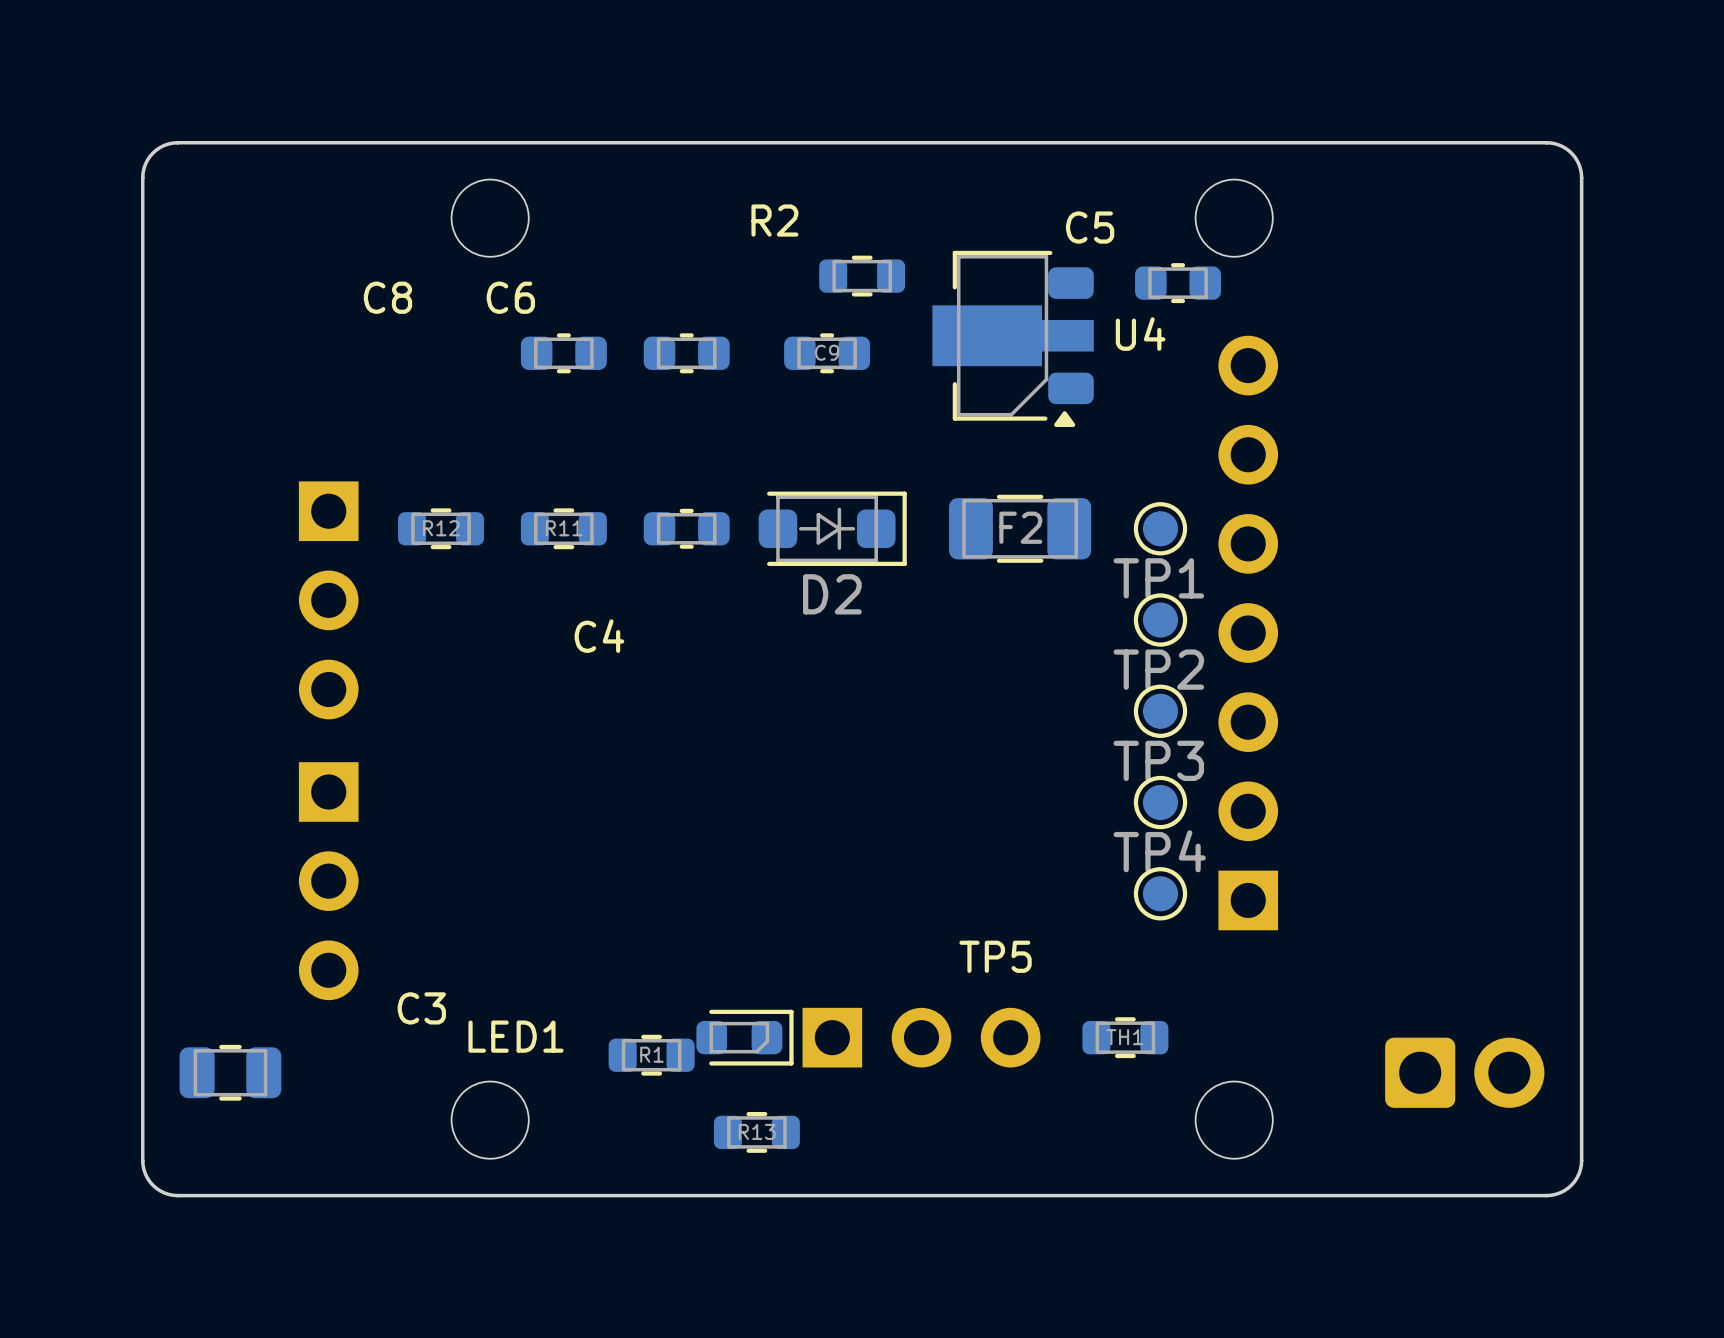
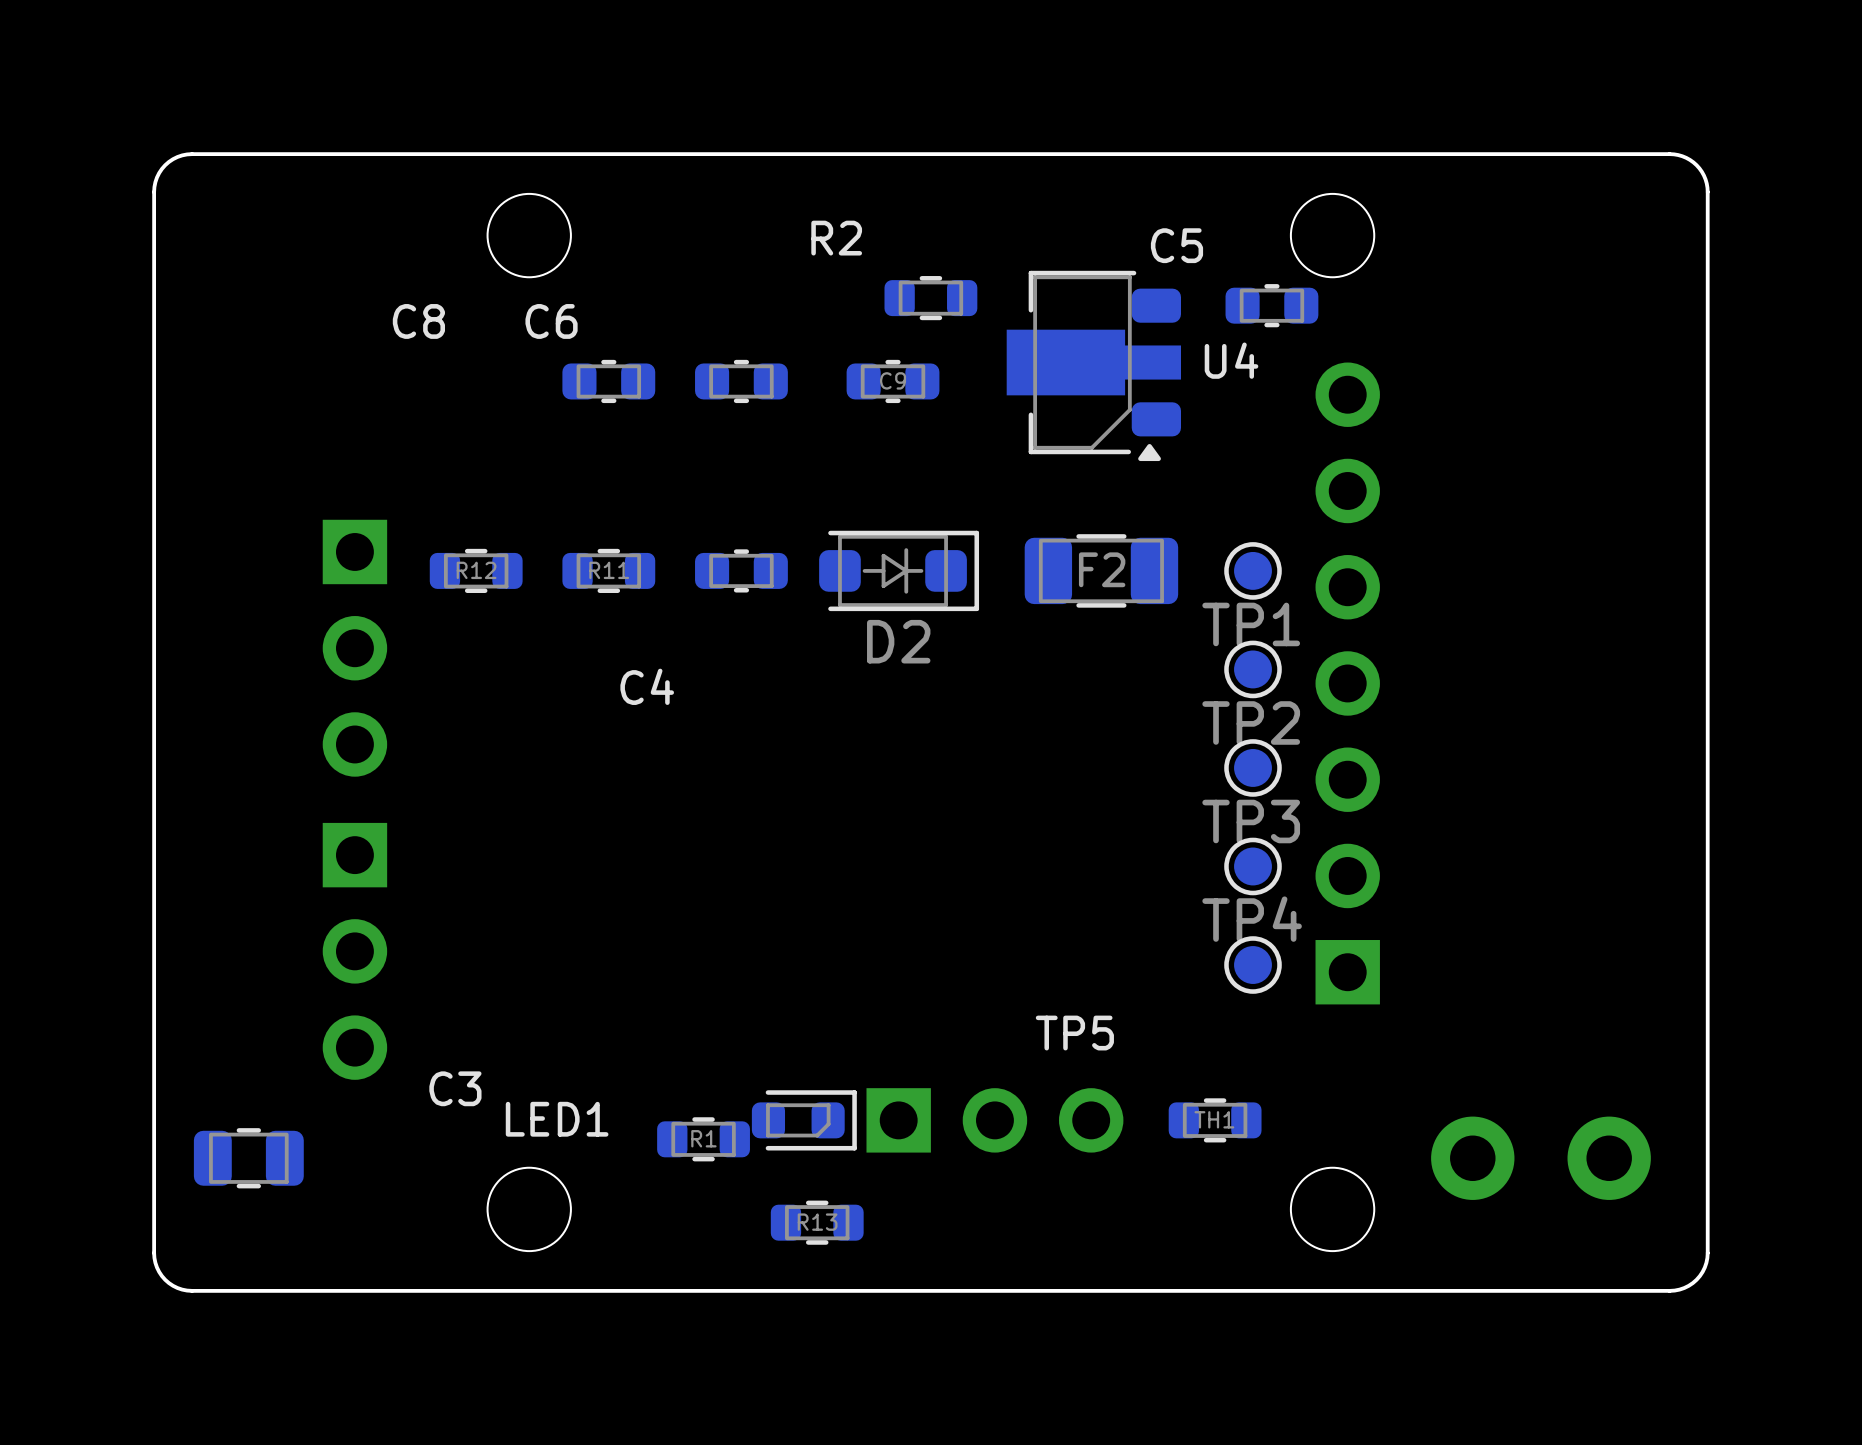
part: none -> (1540, 1158)
part: (1464, 1072) -> none

